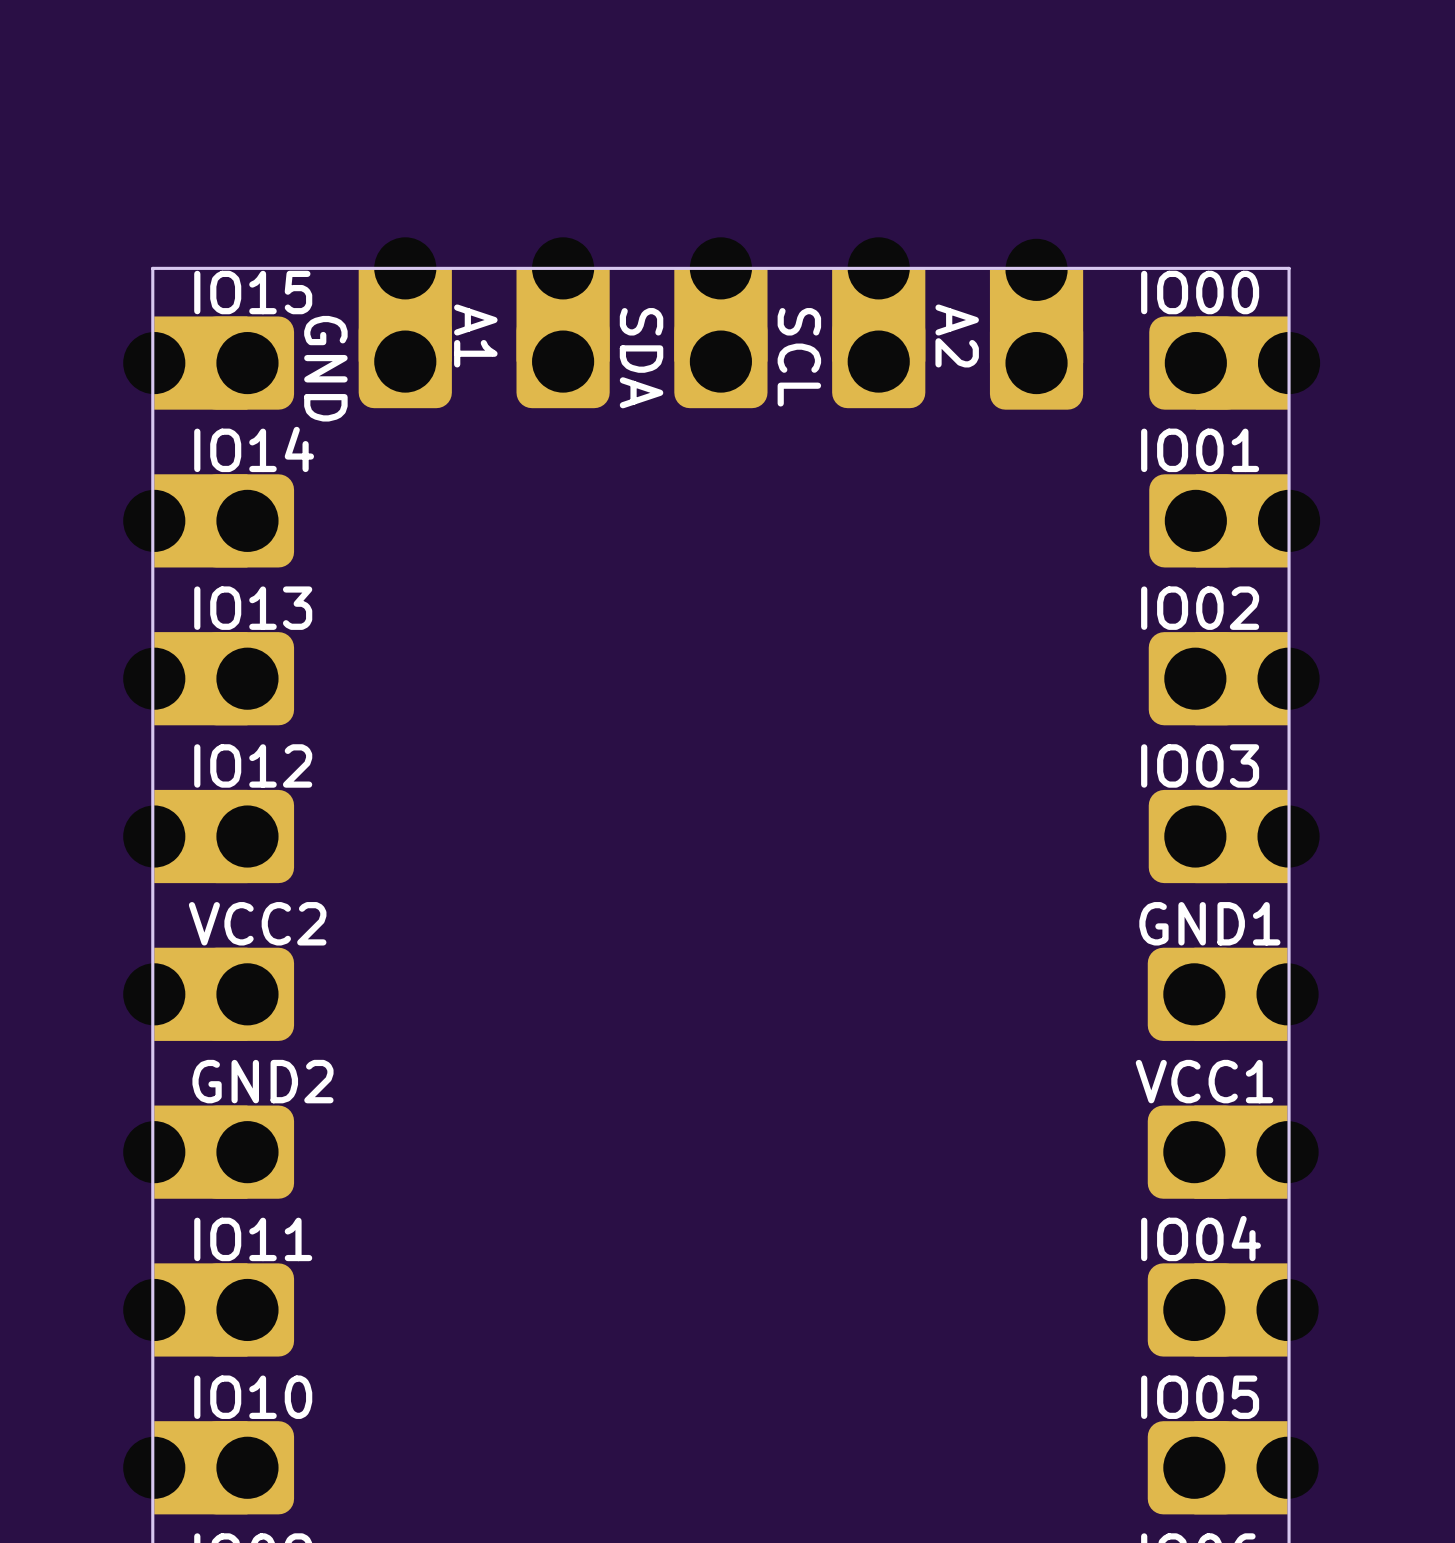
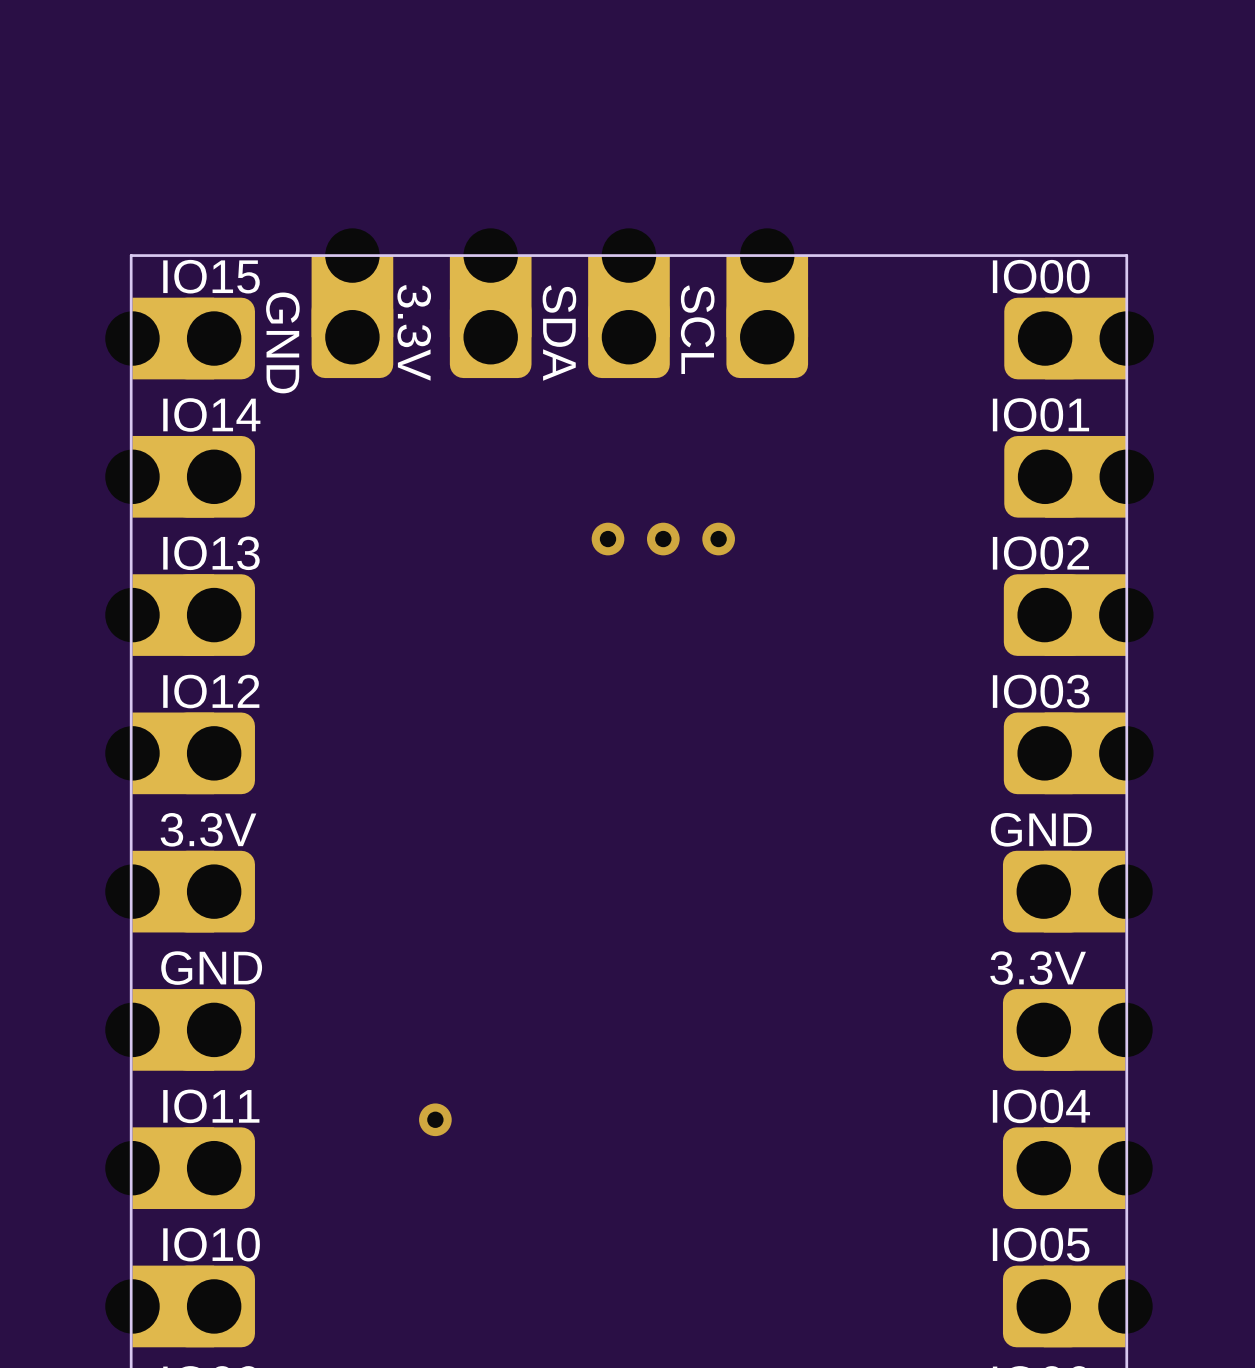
part: (1036, 324) -> none
text: A1 (475, 335) -> 3.3V (414, 332)
text: A2 (957, 335) -> none
via: none -> (608, 539)
via: none -> (663, 539)
via: none -> (718, 539)
text: VCC2 (257, 923) -> 3.3V (208, 829)
text: GND1 (1209, 923) -> GND (1041, 829)
text: GND2 (262, 1081) -> GND (211, 968)
text: VCC1 (1204, 1081) -> 3.3V (1038, 968)
via: none -> (435, 1119)

